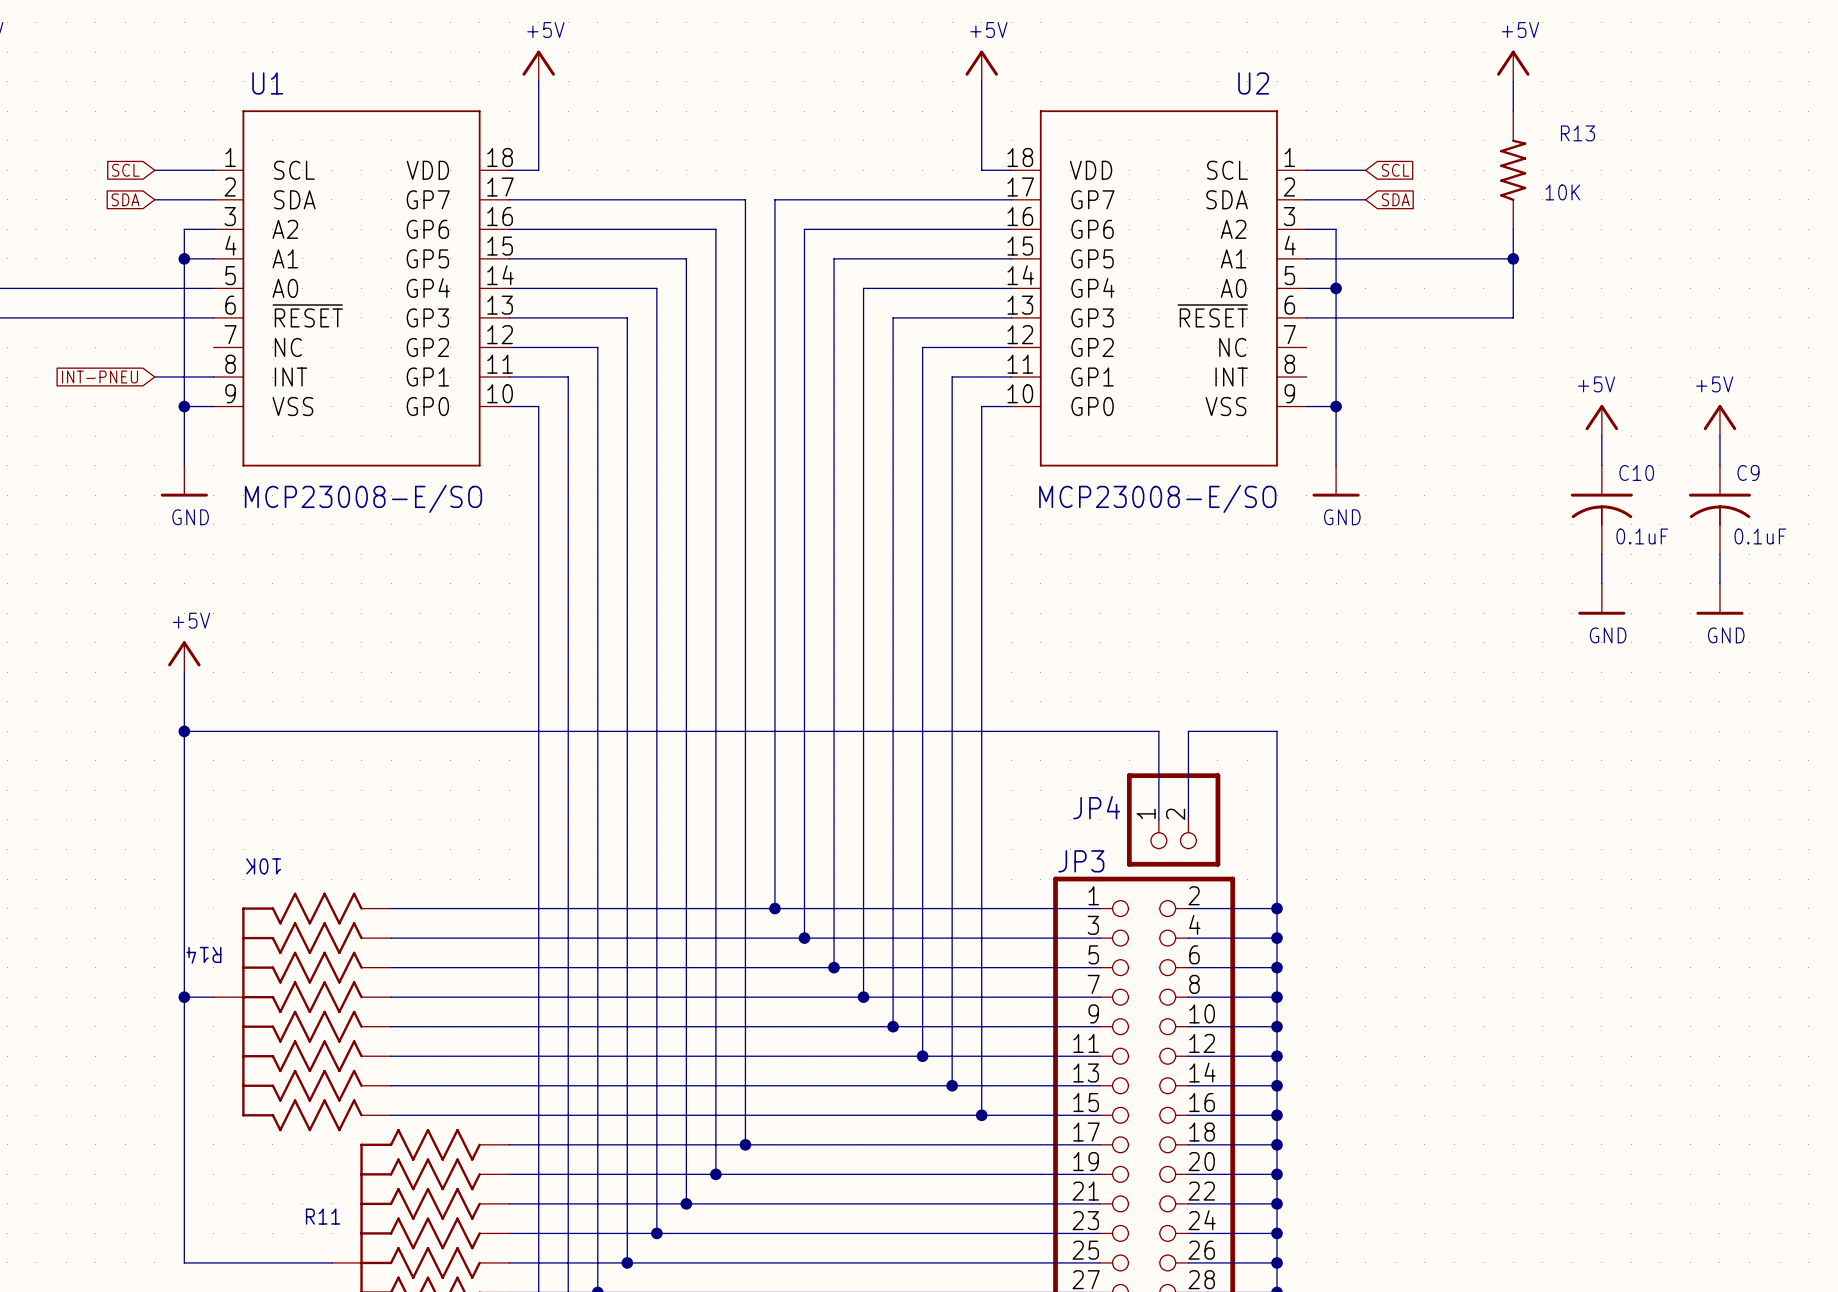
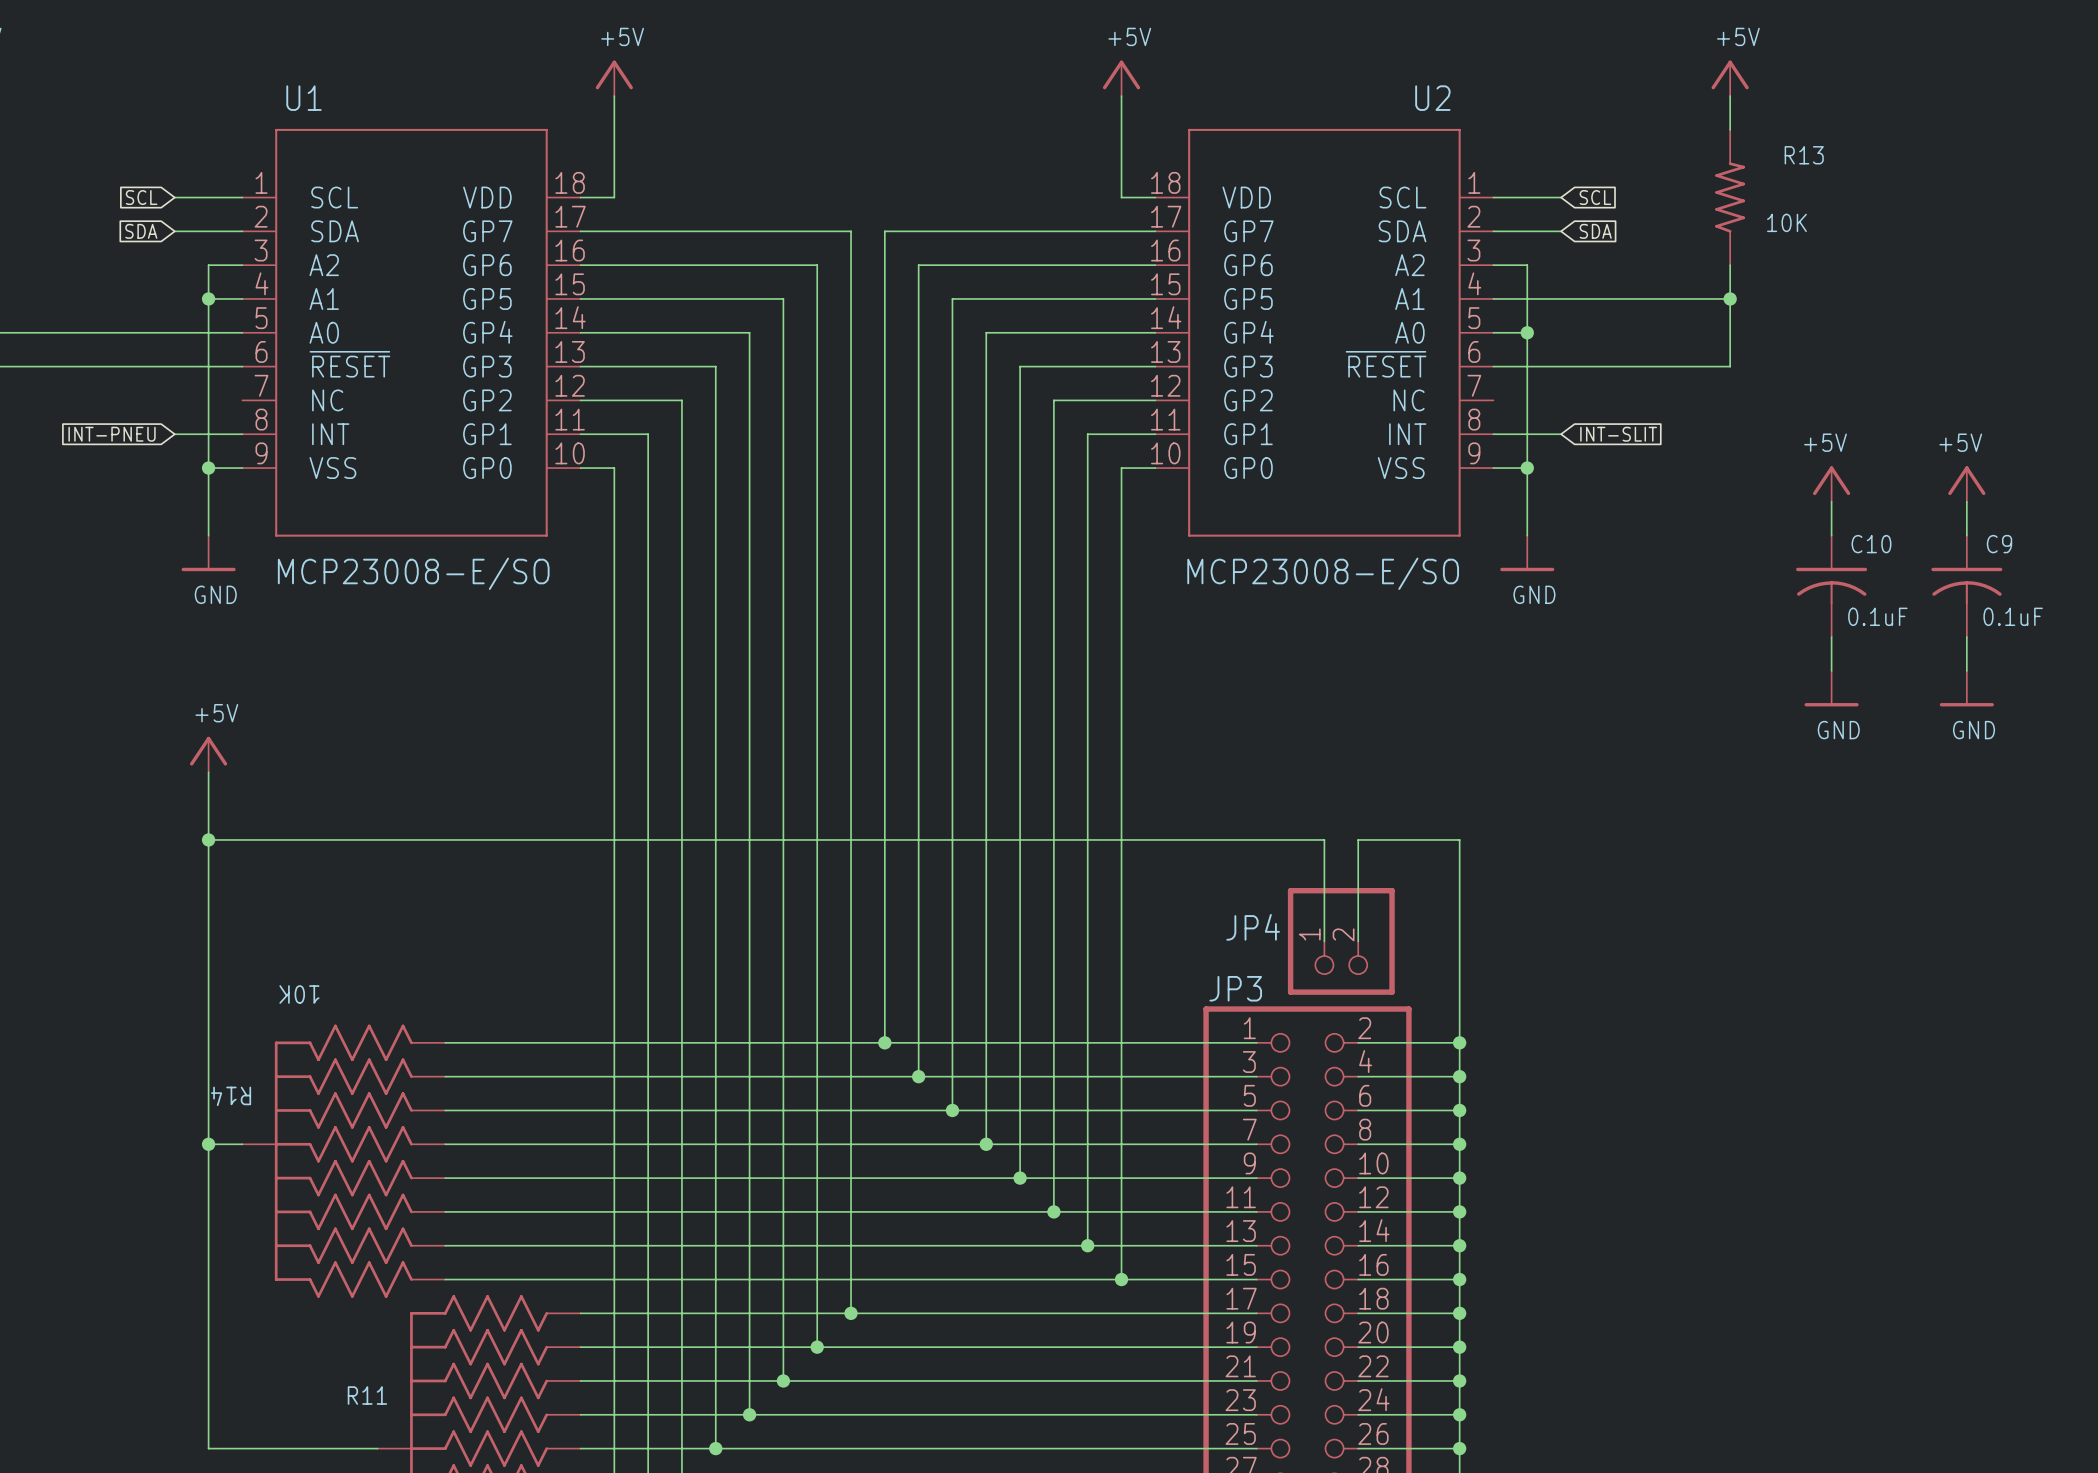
wire: none -> (1493, 434) (1561, 434)
global label: none -> INT-SLIT (1618, 434)

